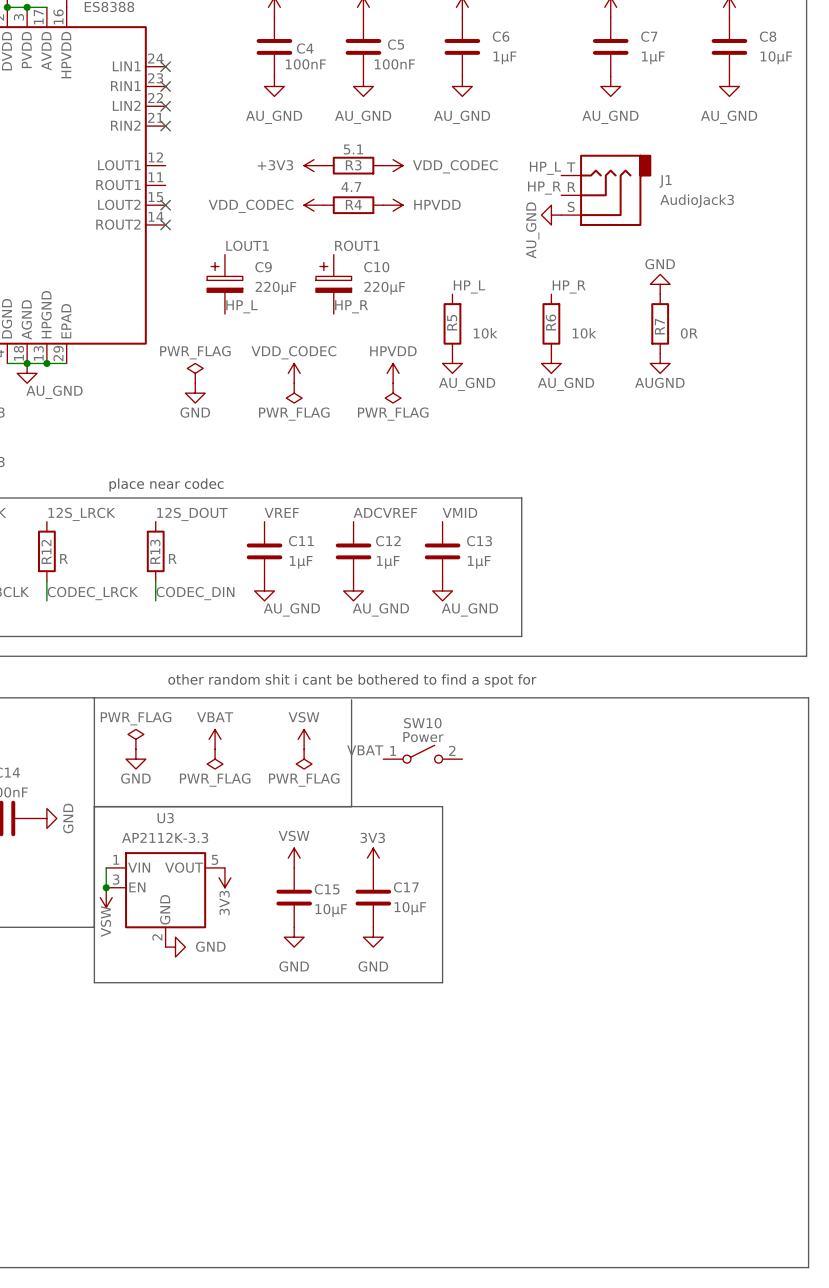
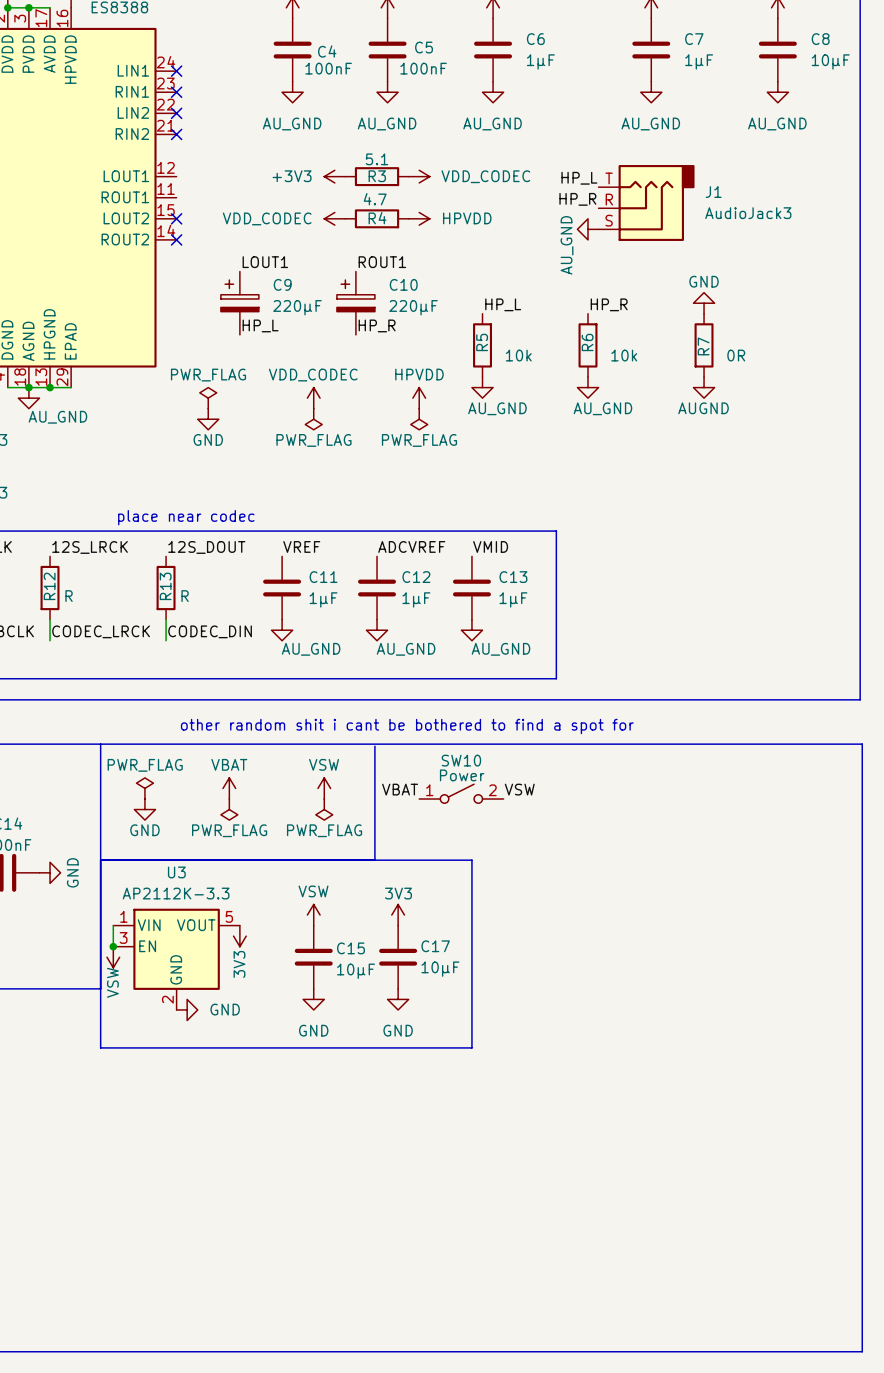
label: none -> VSW (519, 789)
label position: VBAT (365, 750) -> VBAT (400, 789)
SW10 position: (422, 754) -> (461, 793)

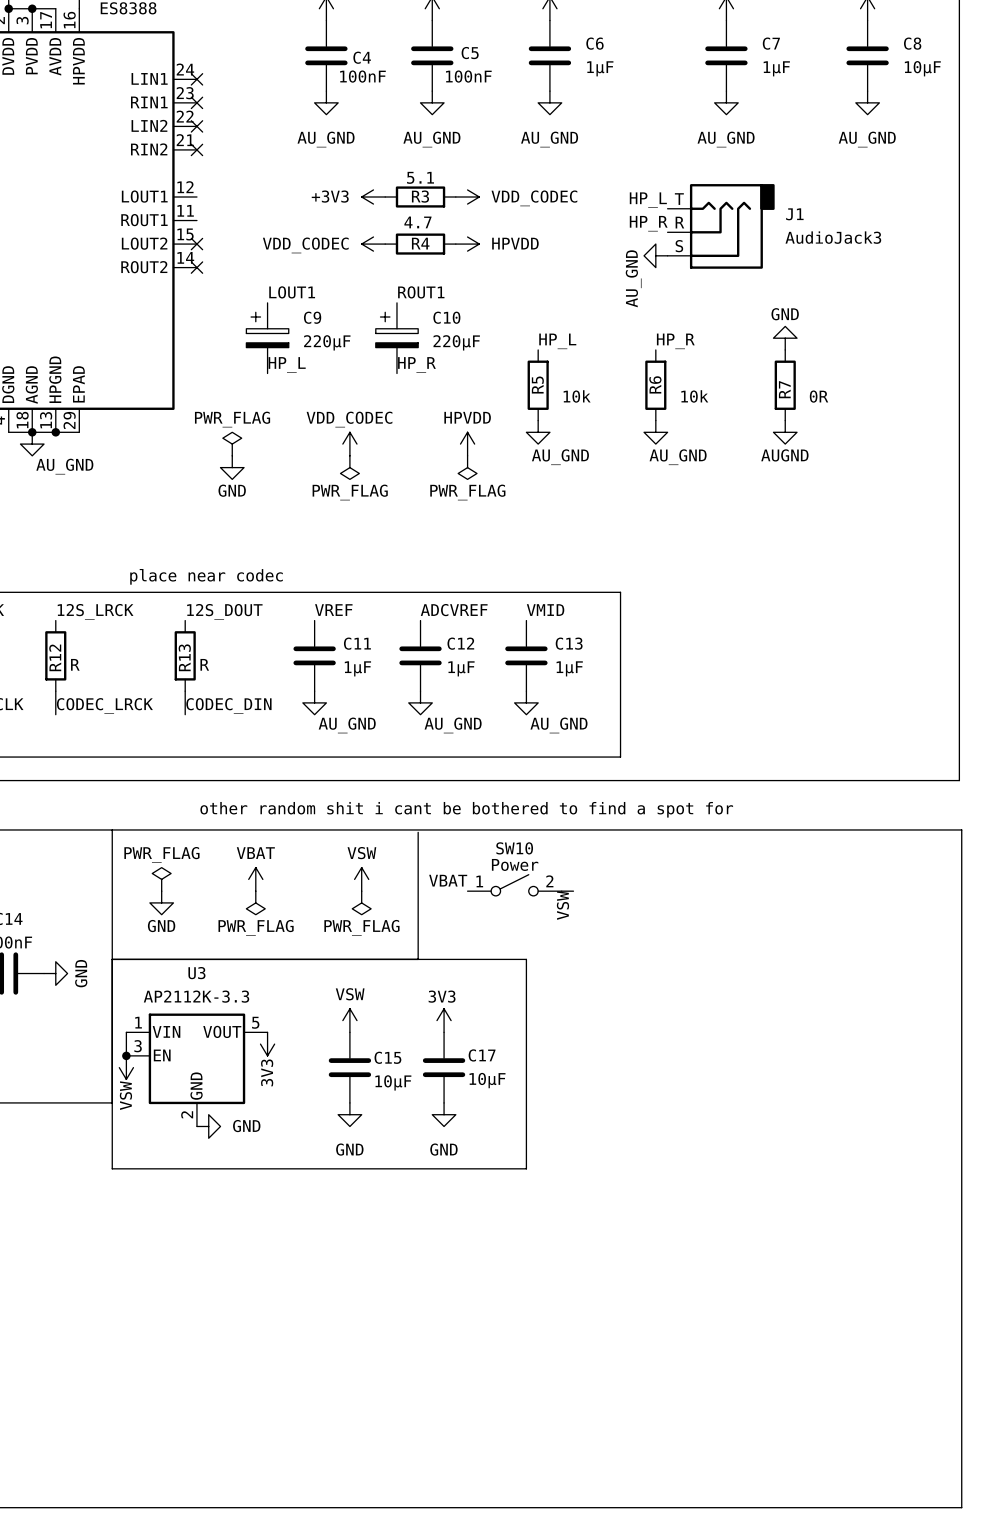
label rotation: 0° (519, 789) -> 90° counterclockwise (562, 905)
wire: none -> (561, 891) (573, 891)

